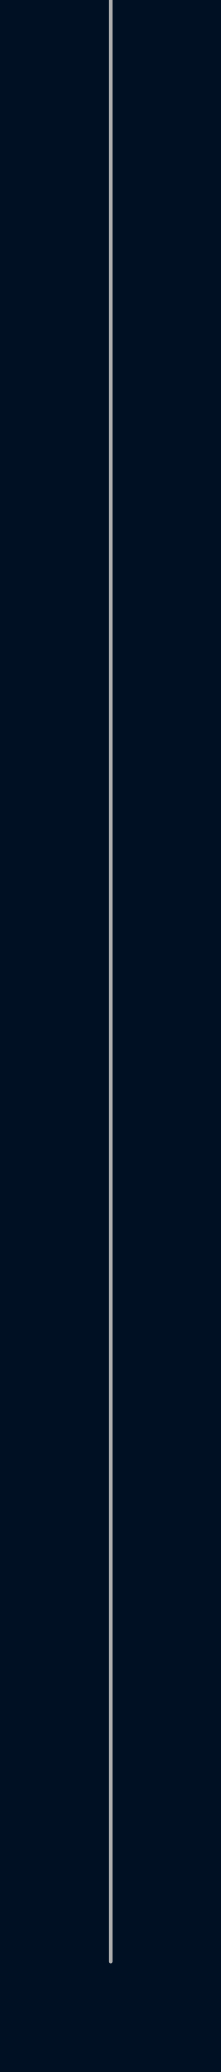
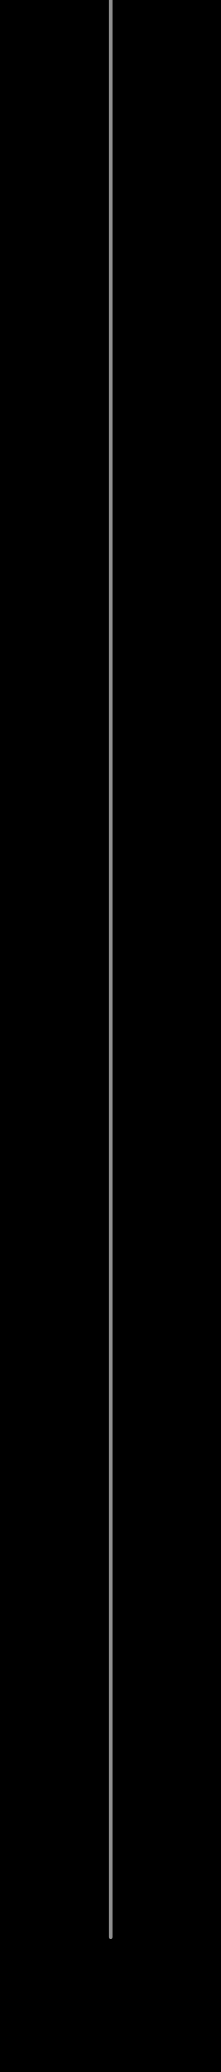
line: (110, 1937) (110, 1961) -> none

